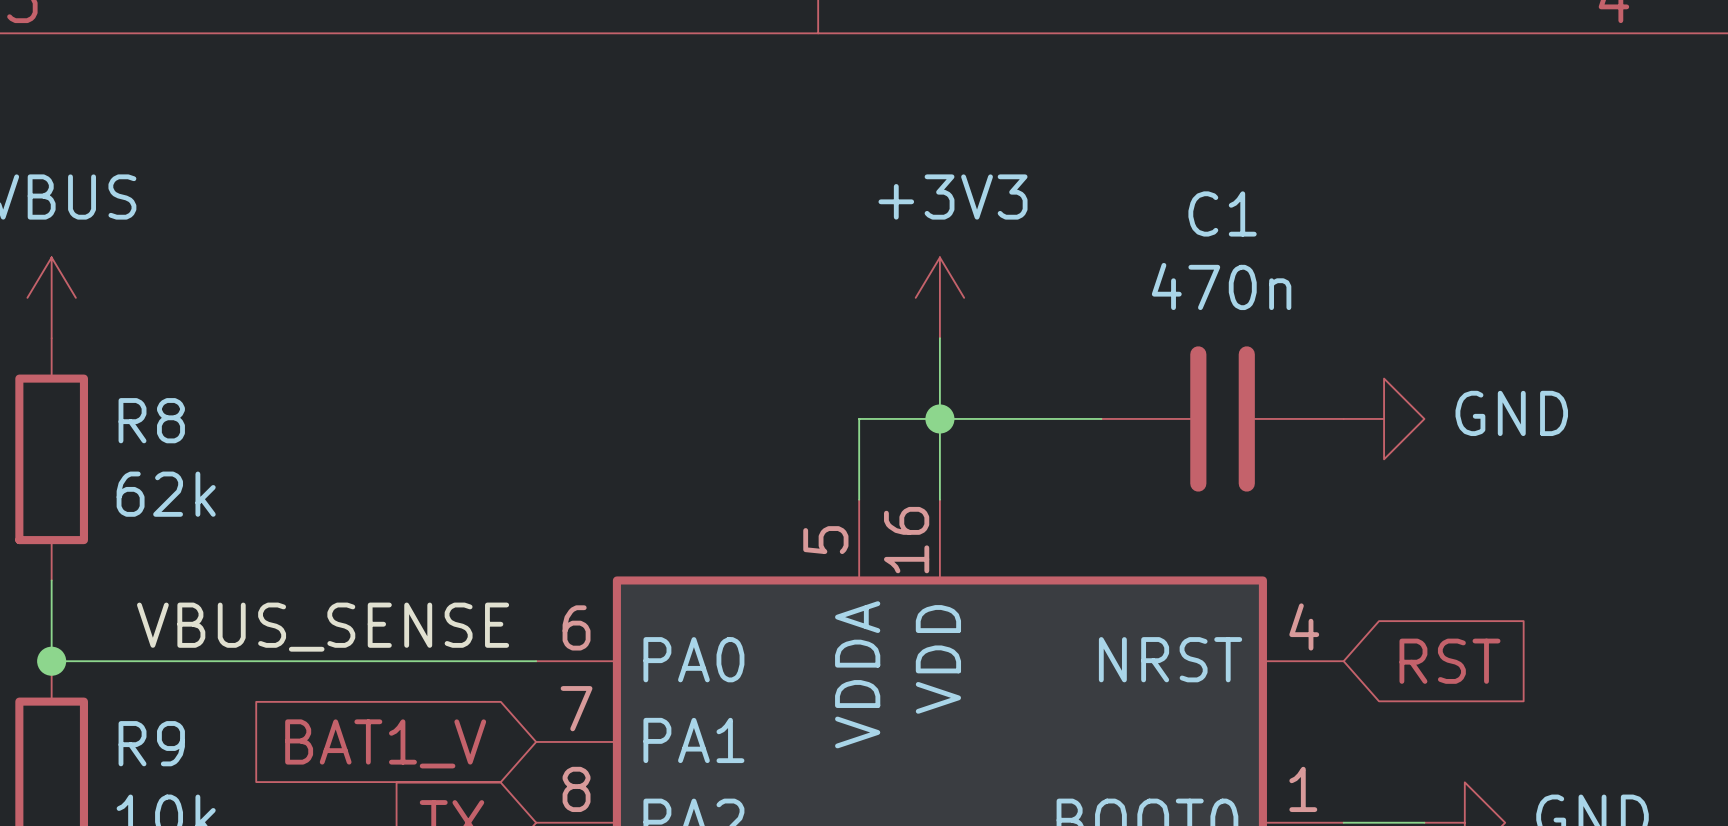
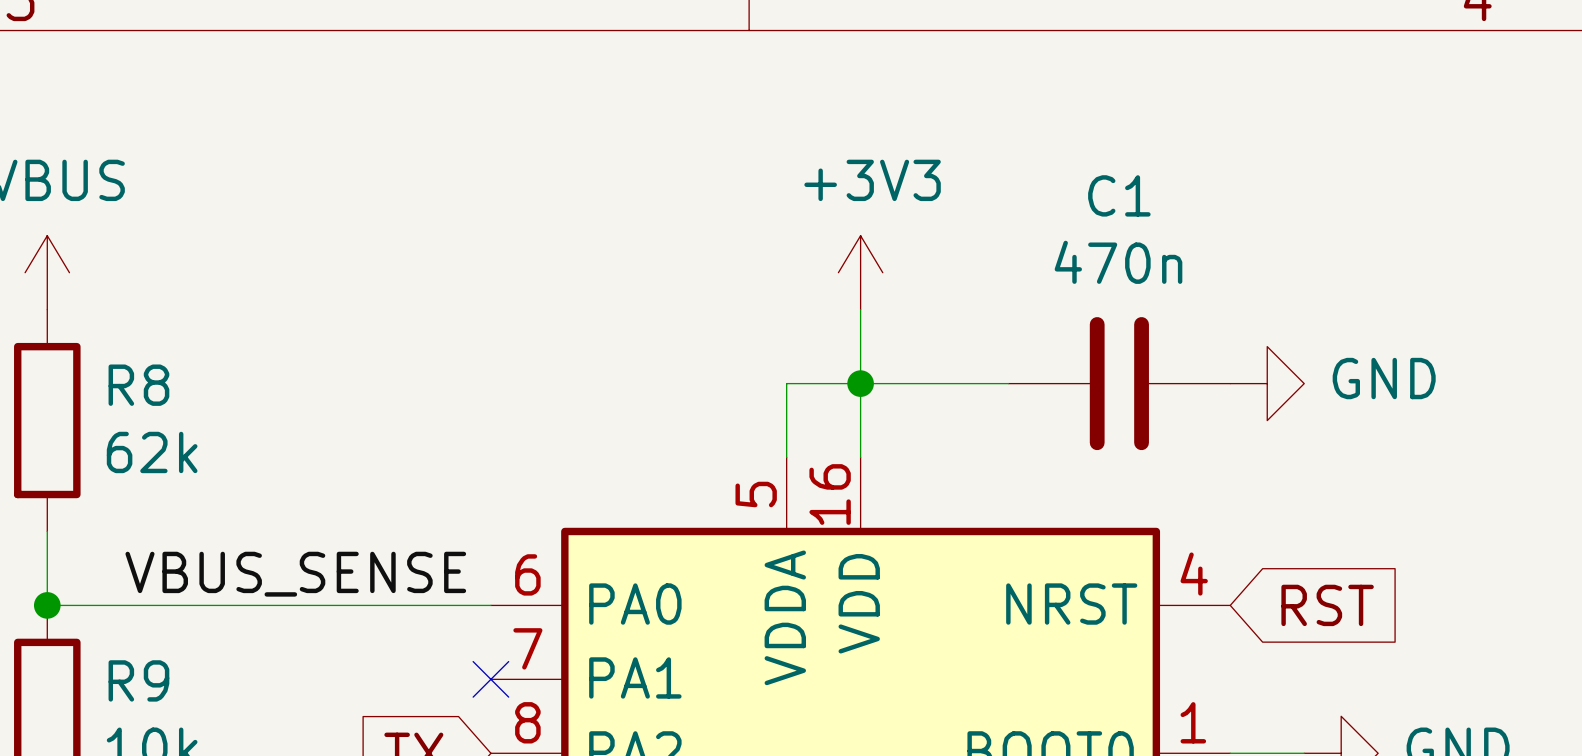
no-connect mark: none -> (490, 679)
global label: BAT1_V (385, 743) -> none

